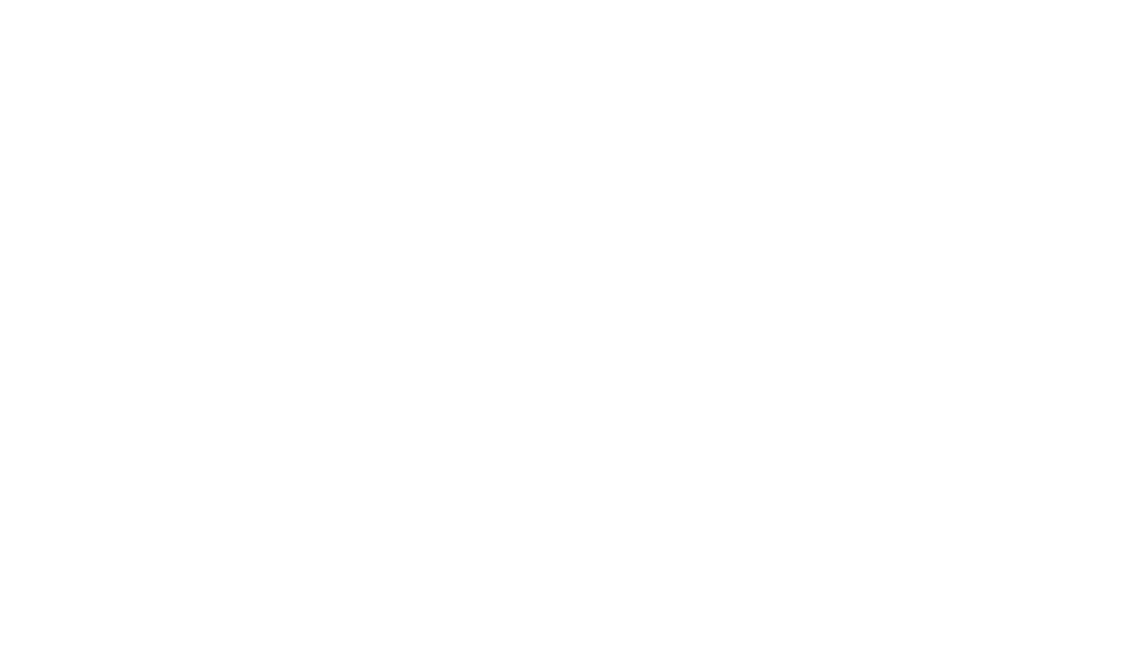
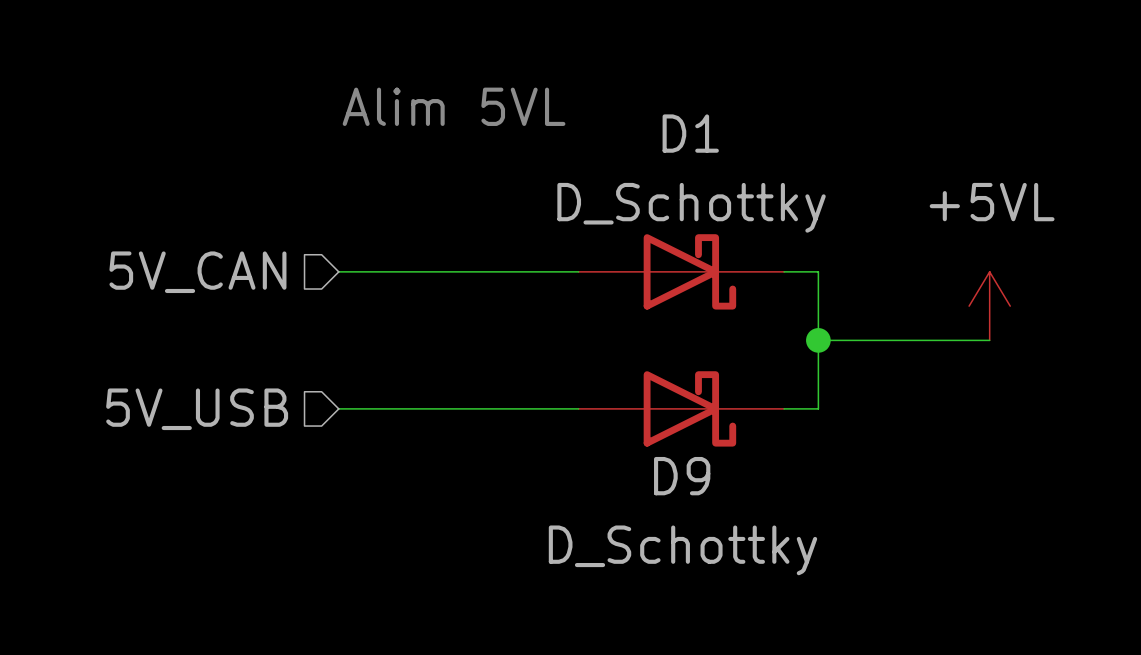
text: none -> Alim 5VL (454, 106)
hierarchical label: none -> 5V_CAN (197, 272)
wire: none -> (338, 271) (578, 271)
D1: none -> D_Schottky (681, 271)
wire: none -> (784, 271) (818, 271) (818, 408) (784, 408)
power symbol: none -> +5VL (989, 306)
wire: none -> (818, 340) (989, 340)
junction: none -> (818, 340)
hierarchical label: none -> 5V_USB (197, 409)
wire: none -> (338, 408) (578, 408)
D9: none -> D_Schottky (681, 408)

